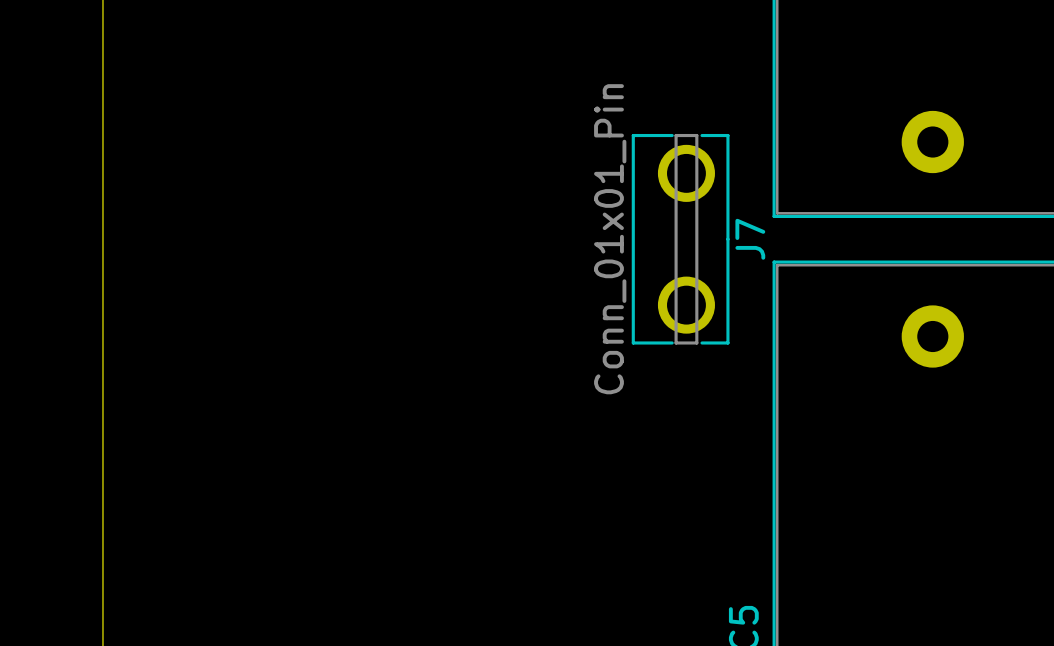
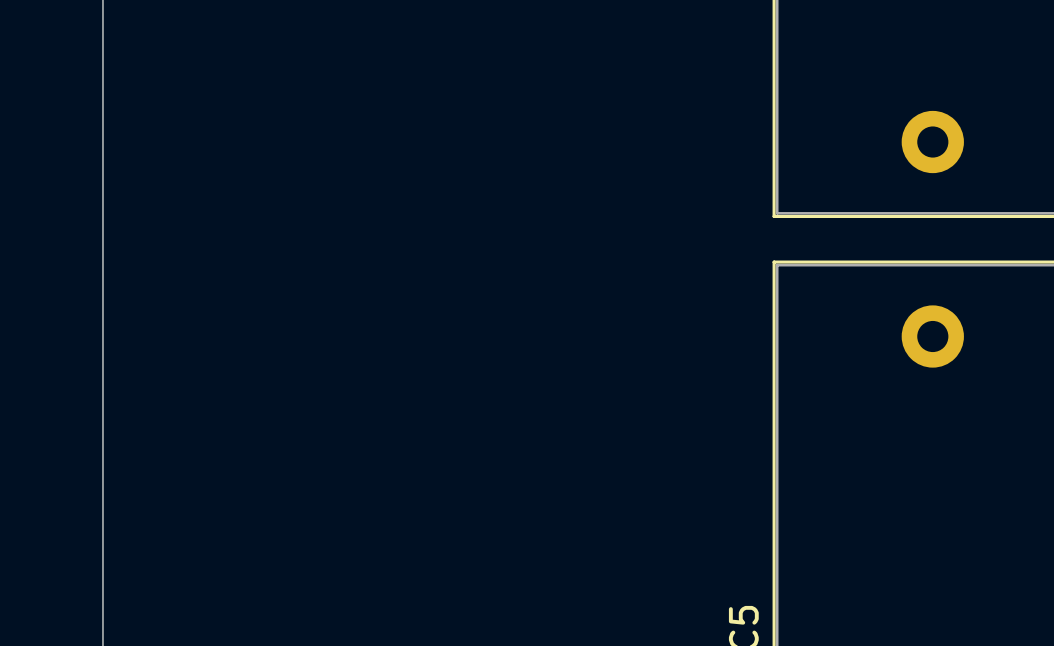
J7: Conn_01x01_Pin (680, 239) -> none

